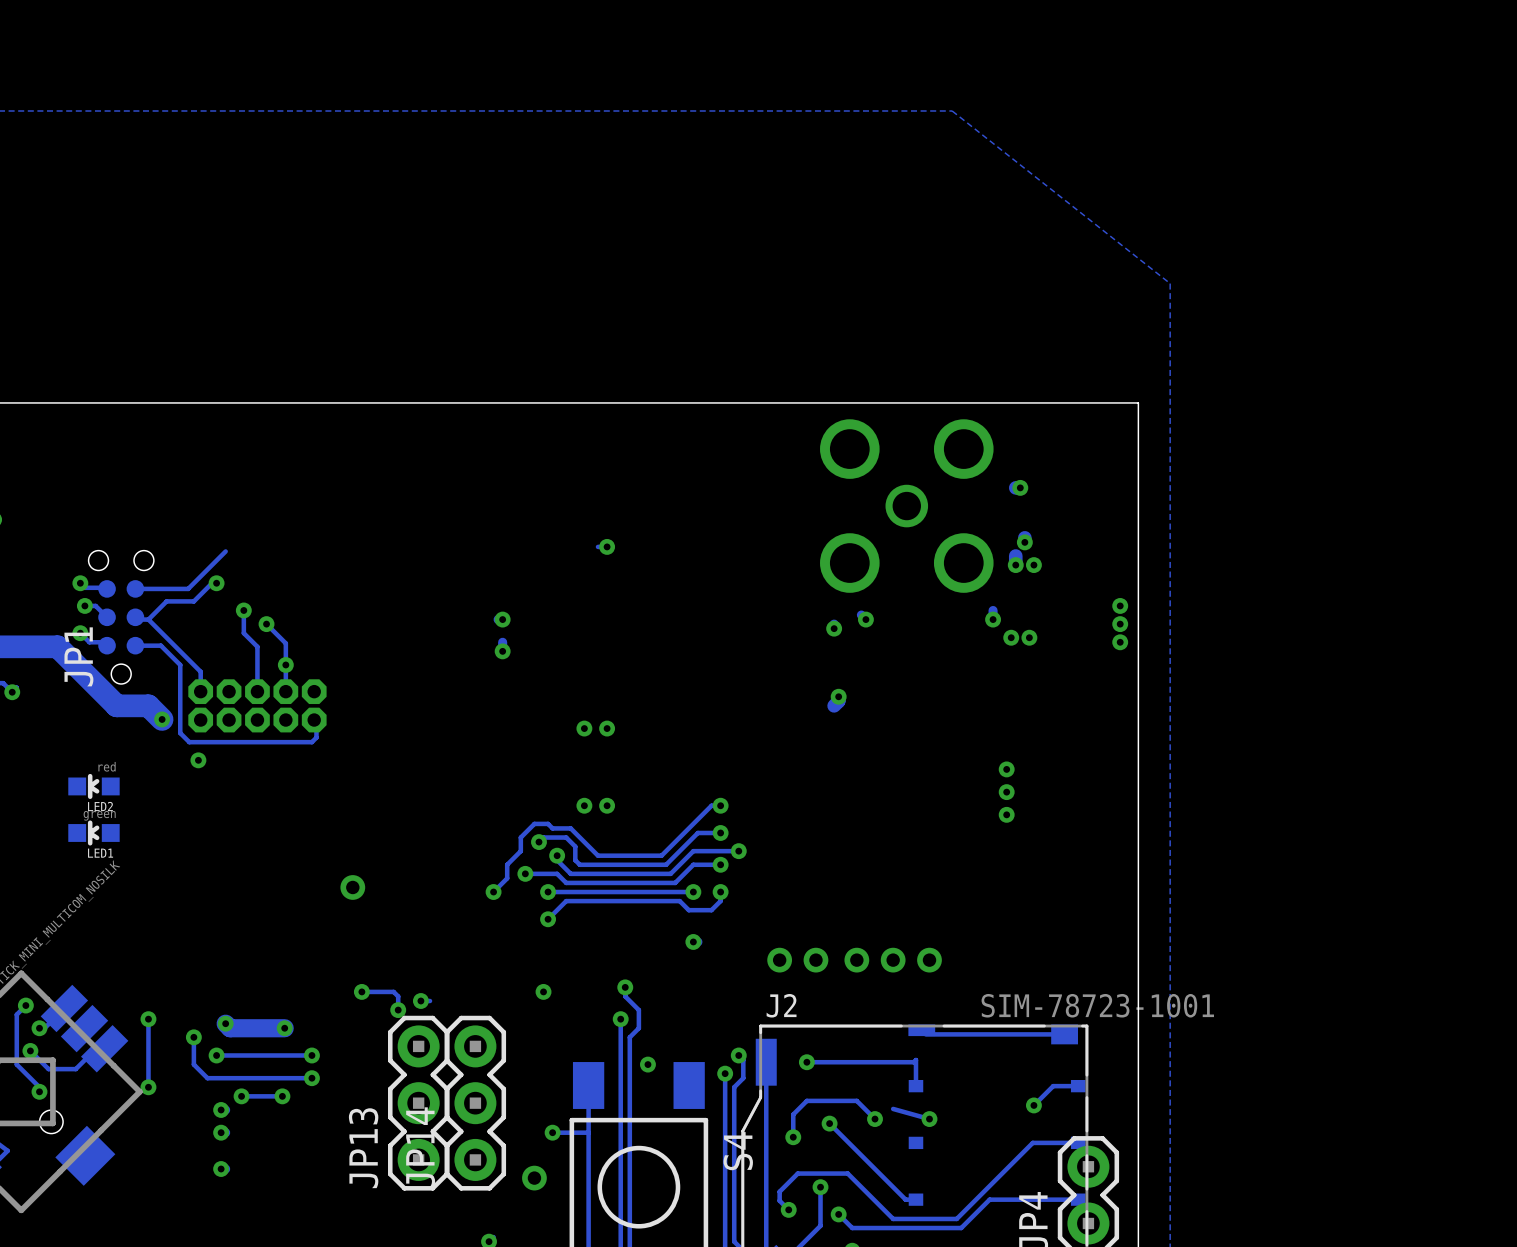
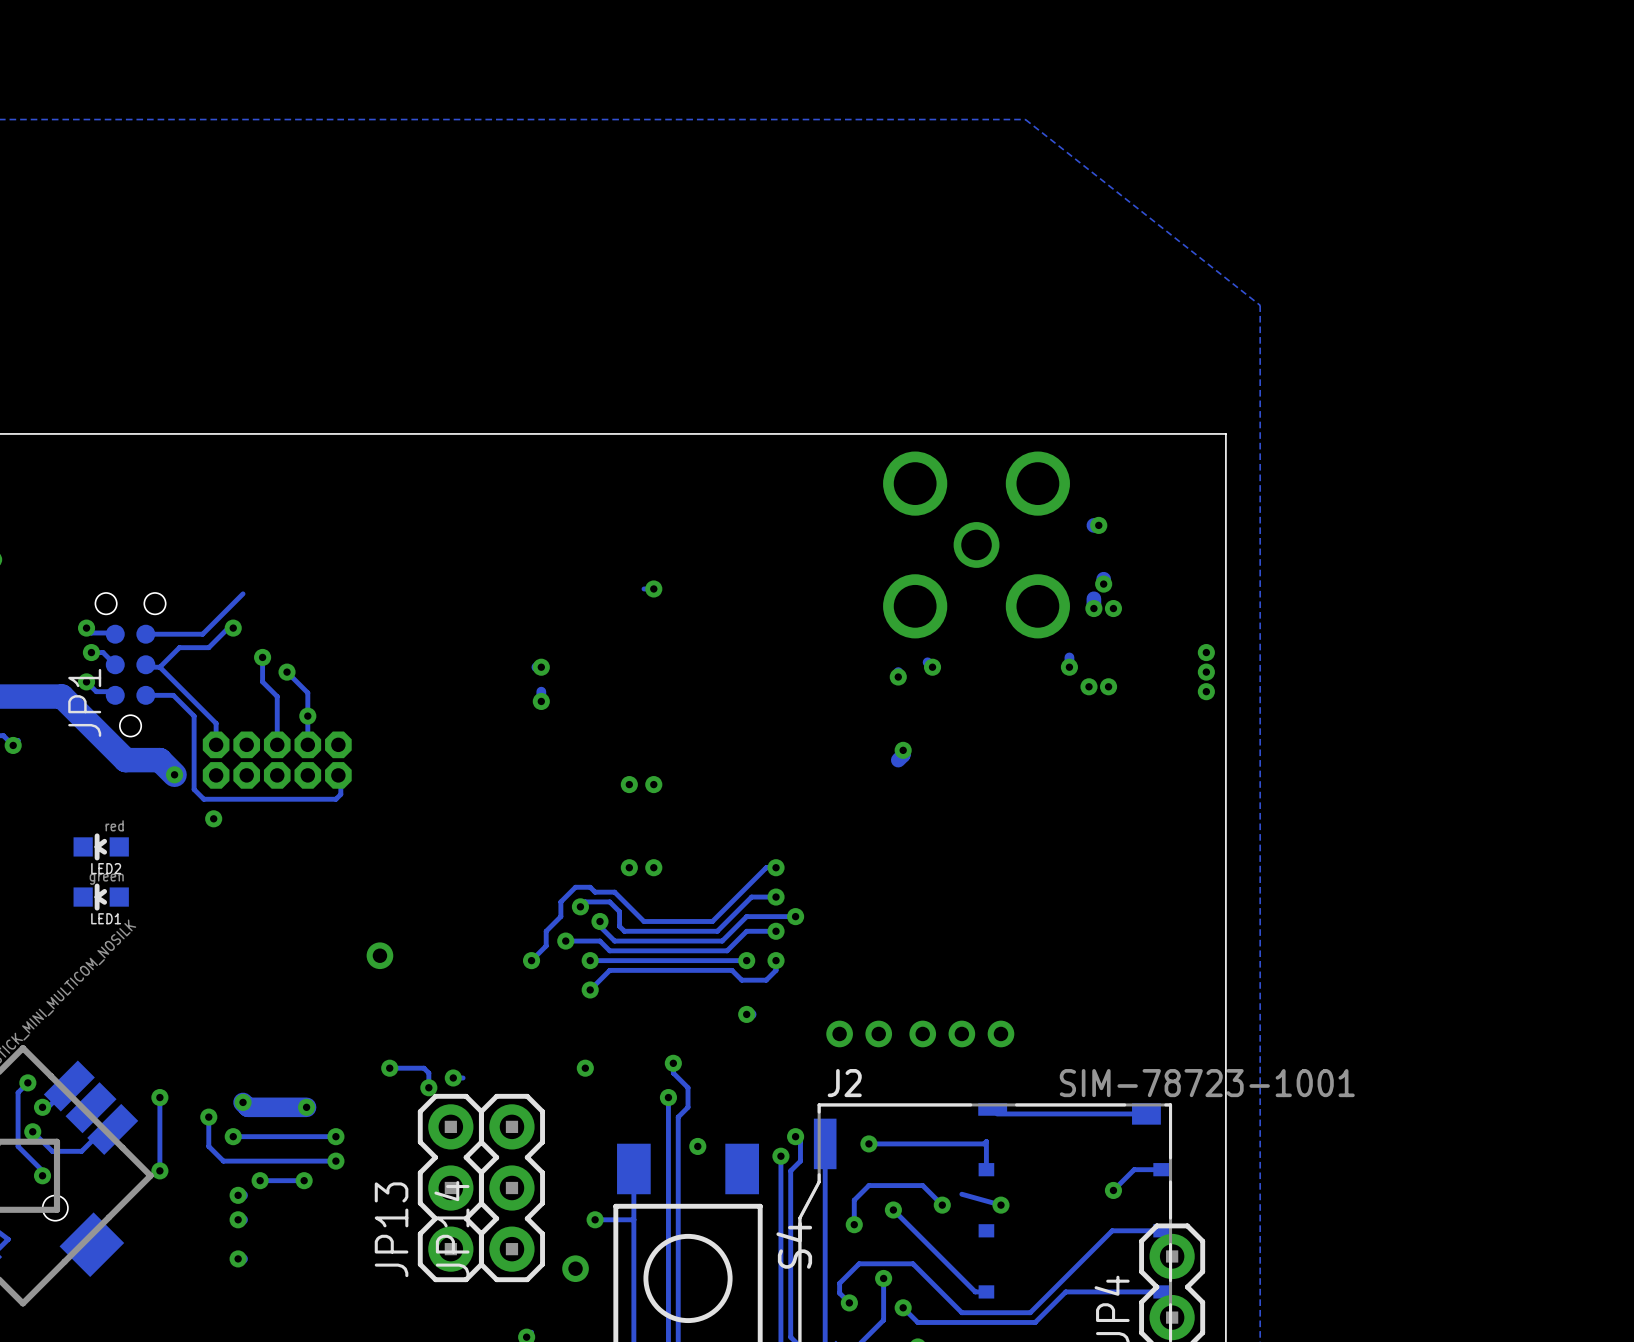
via: (1006, 769) -> none
via: (1006, 792) -> none
via: (1006, 814) -> none

